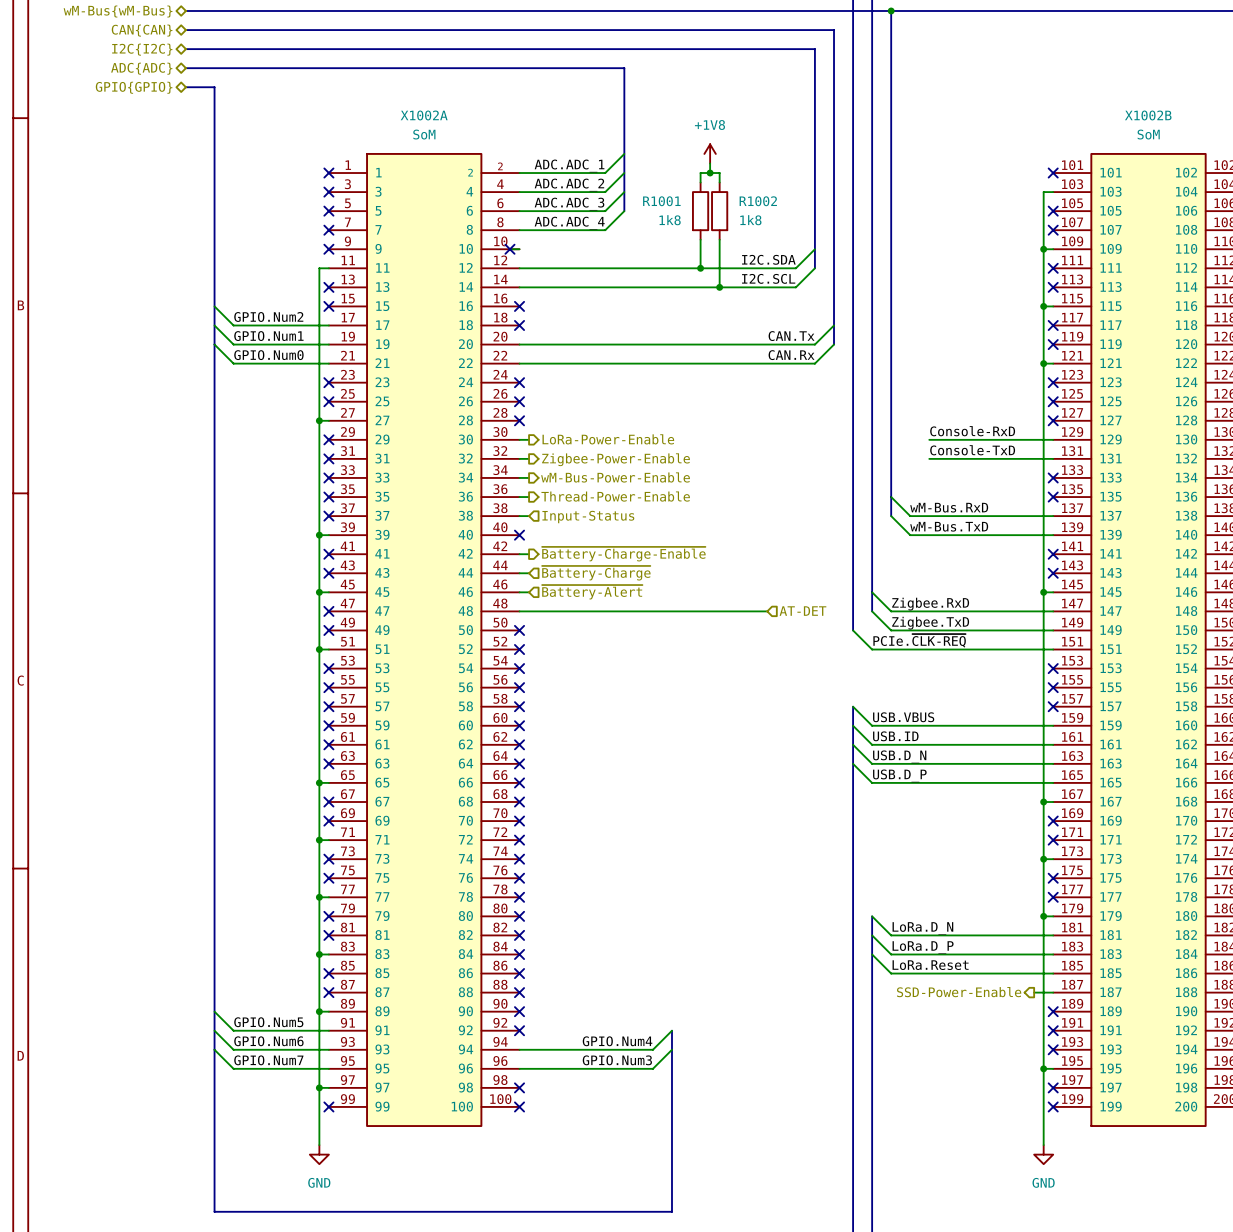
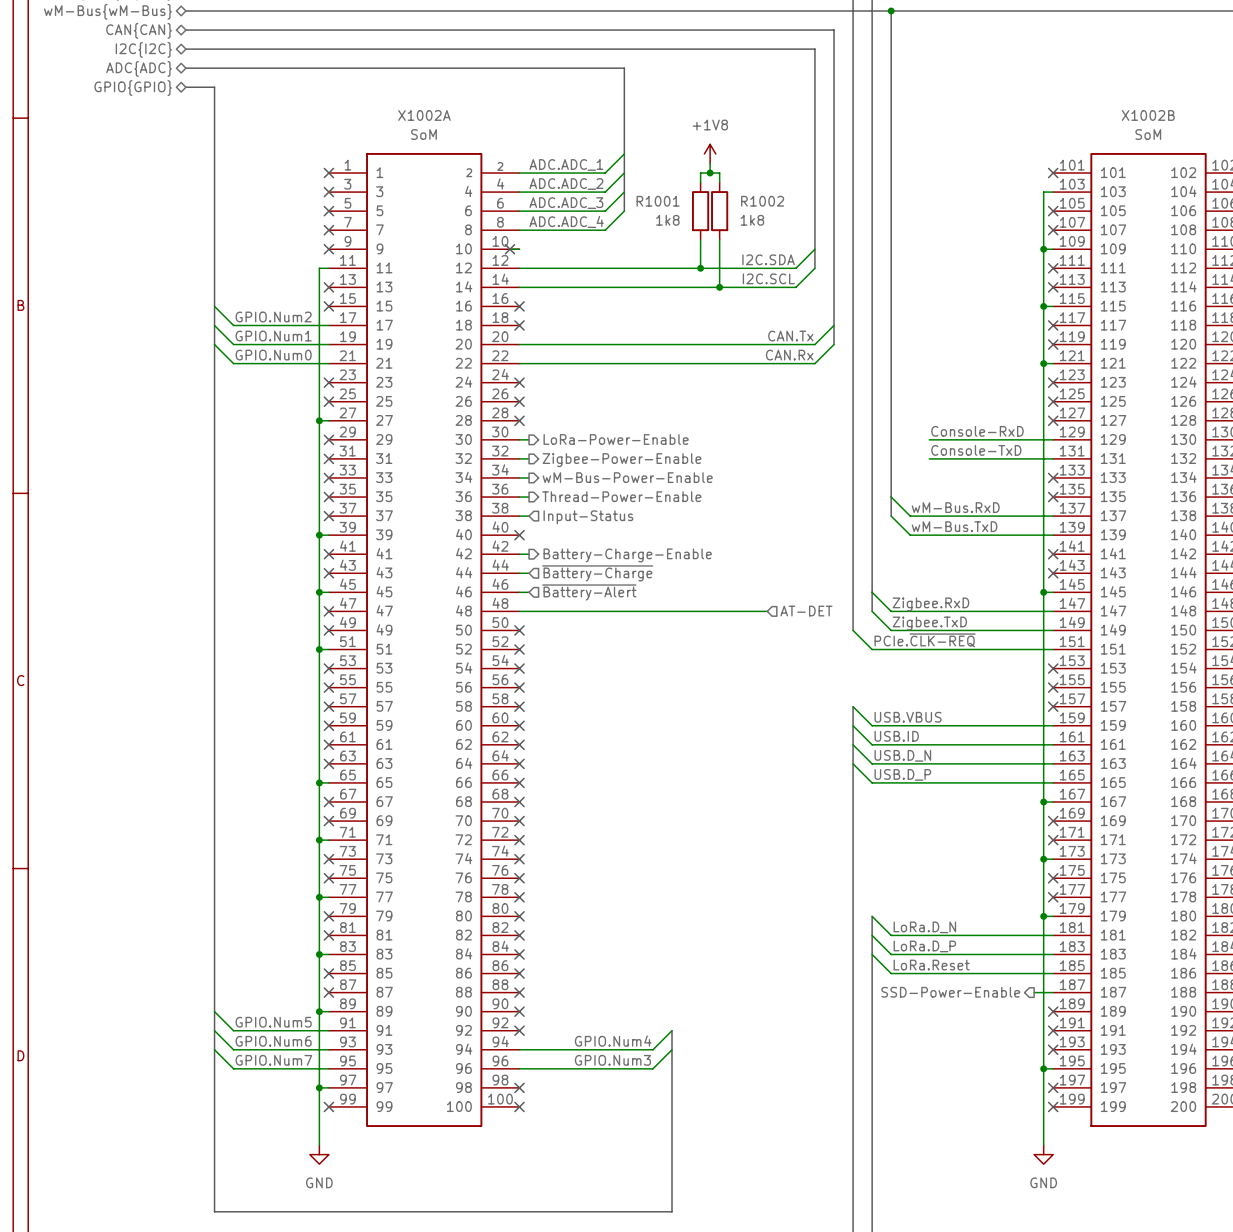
hierarchical label: ~{Battery-Charge-Enable} (623, 554) -> Battery-Charge-Enable (627, 555)

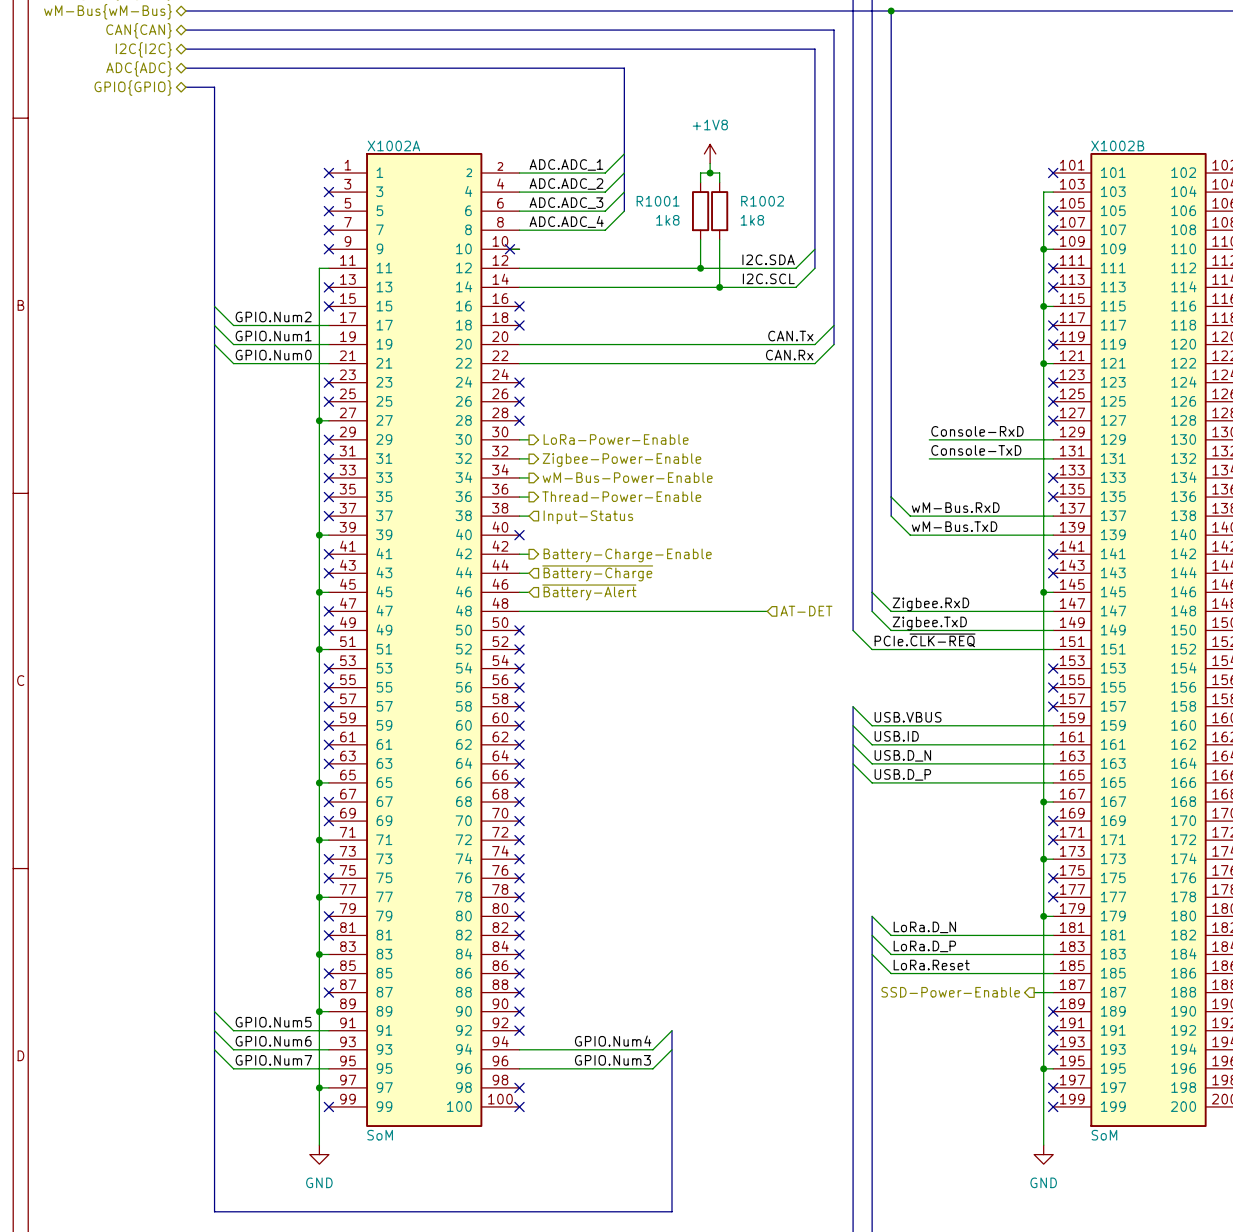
X1002A name position: X1002A (424, 115) -> X1002A (393, 145)
X1002B name position: X1002B (1148, 115) -> X1002B (1117, 145)
X1002A value position: SoM (423, 134) -> SoM (380, 1135)
X1002B value position: SoM (1148, 134) -> SoM (1104, 1135)

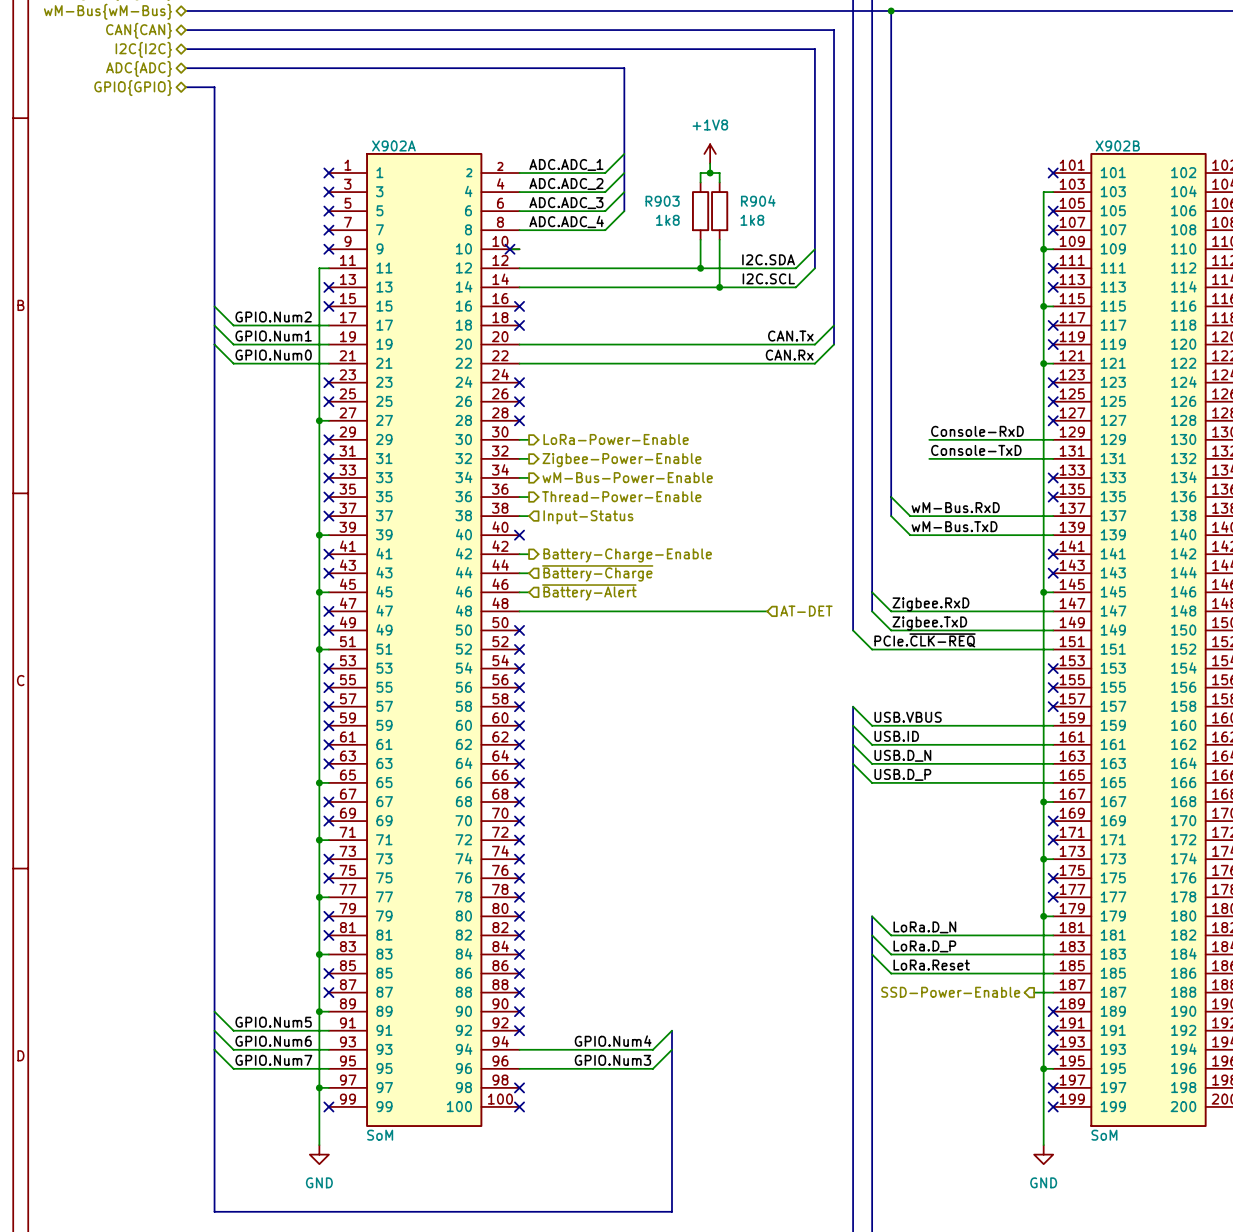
X1002A name: X1002A (393, 145) -> X902A (393, 145)
X1002B name: X1002B (1117, 145) -> X902B (1117, 145)
R1001 name: R1001 (658, 201) -> R903 (662, 201)
R1002 name: R1002 (762, 201) -> R904 (758, 201)

